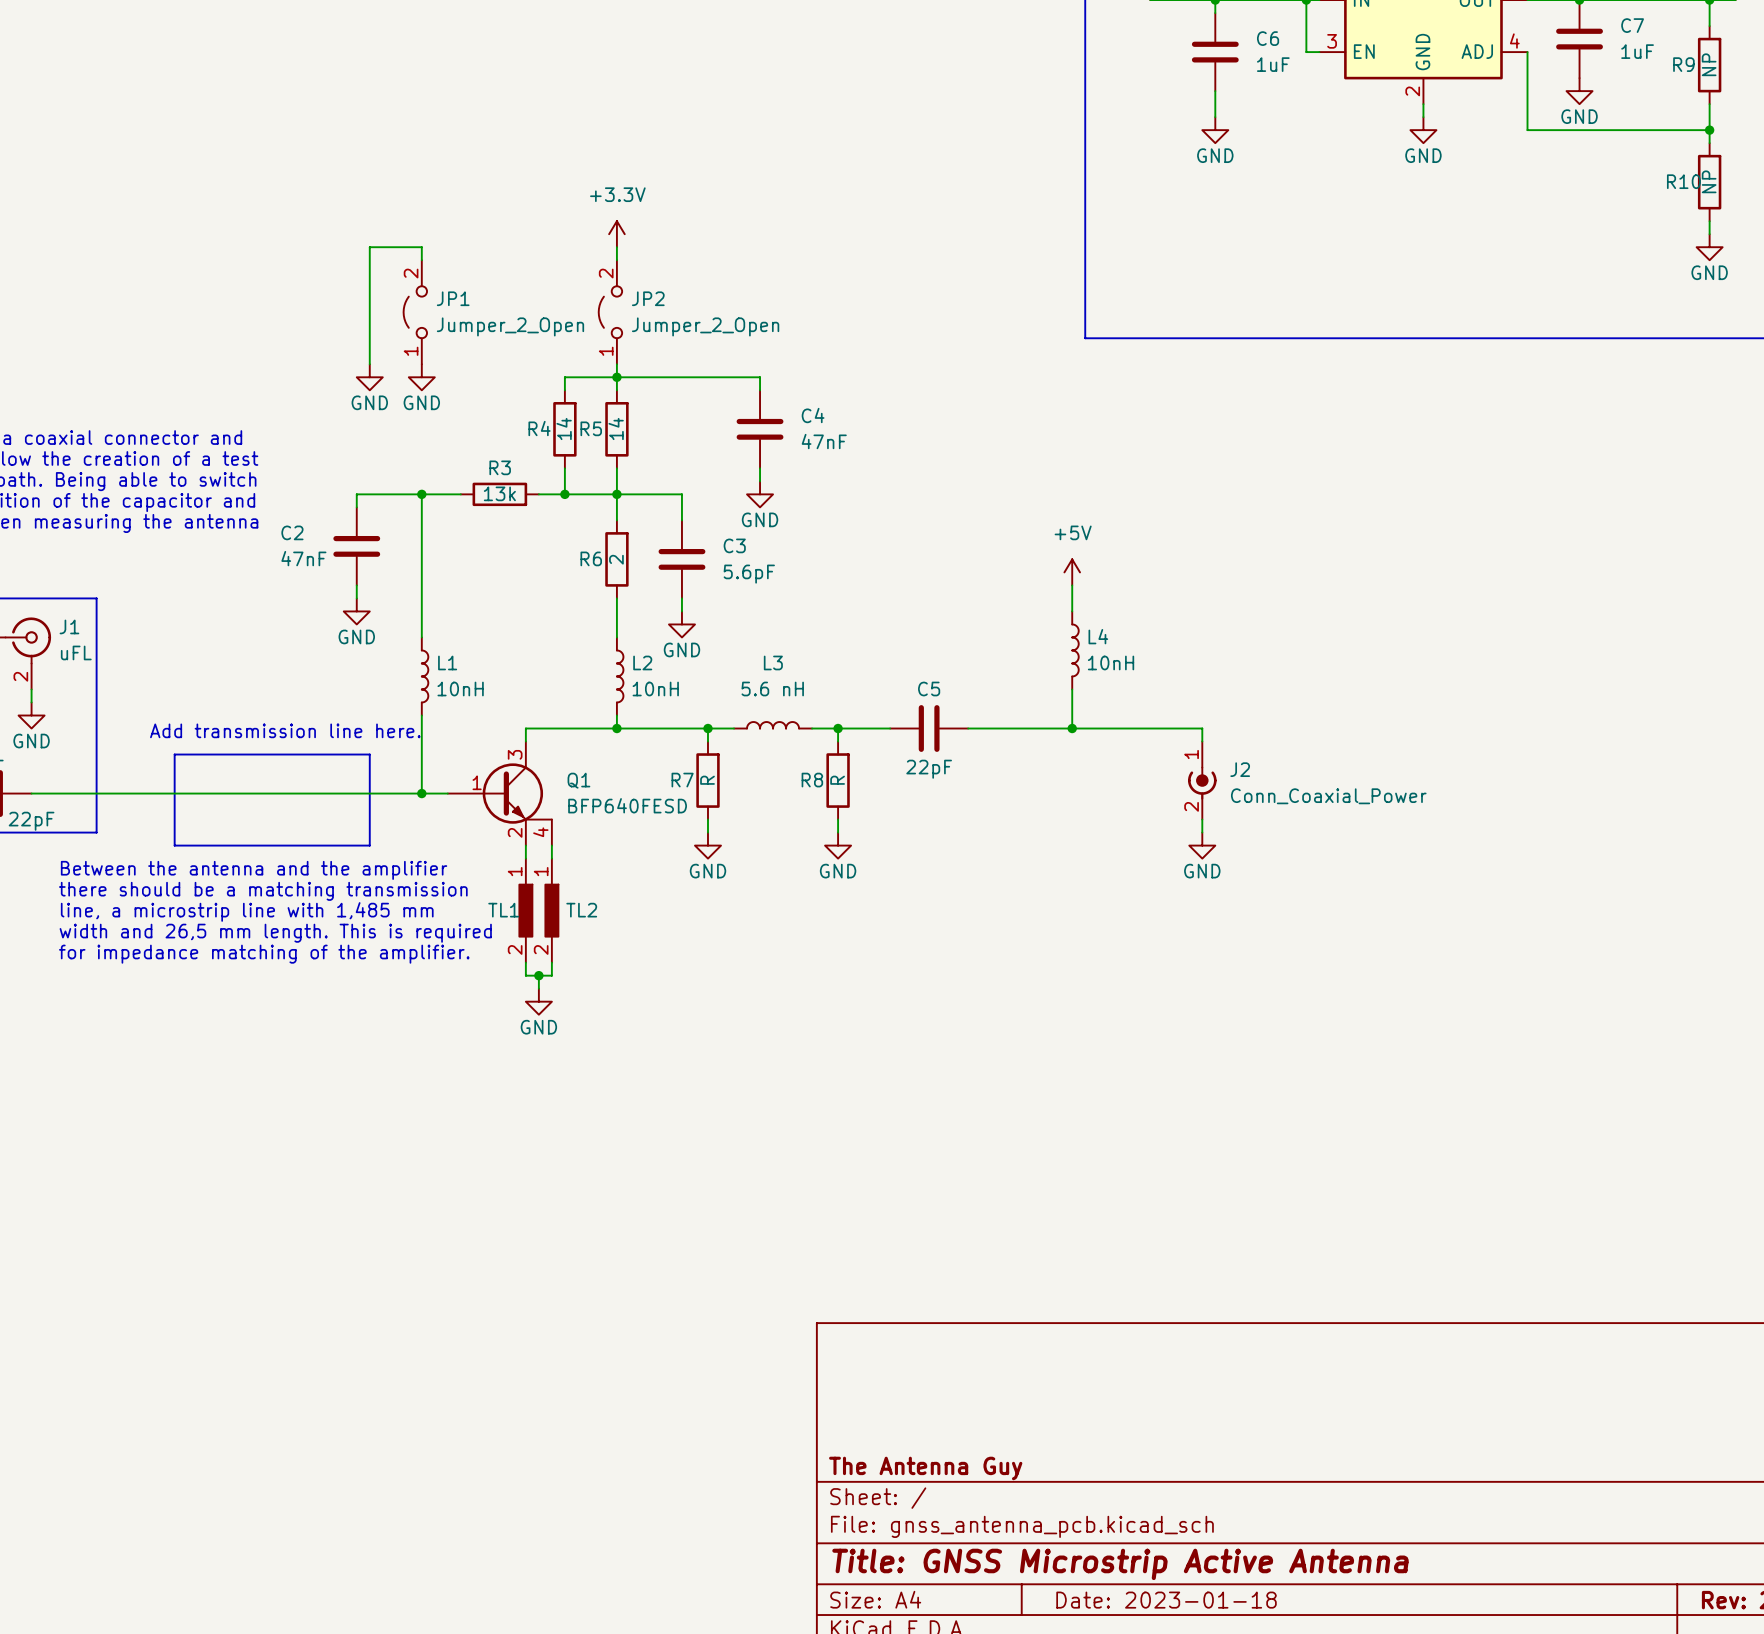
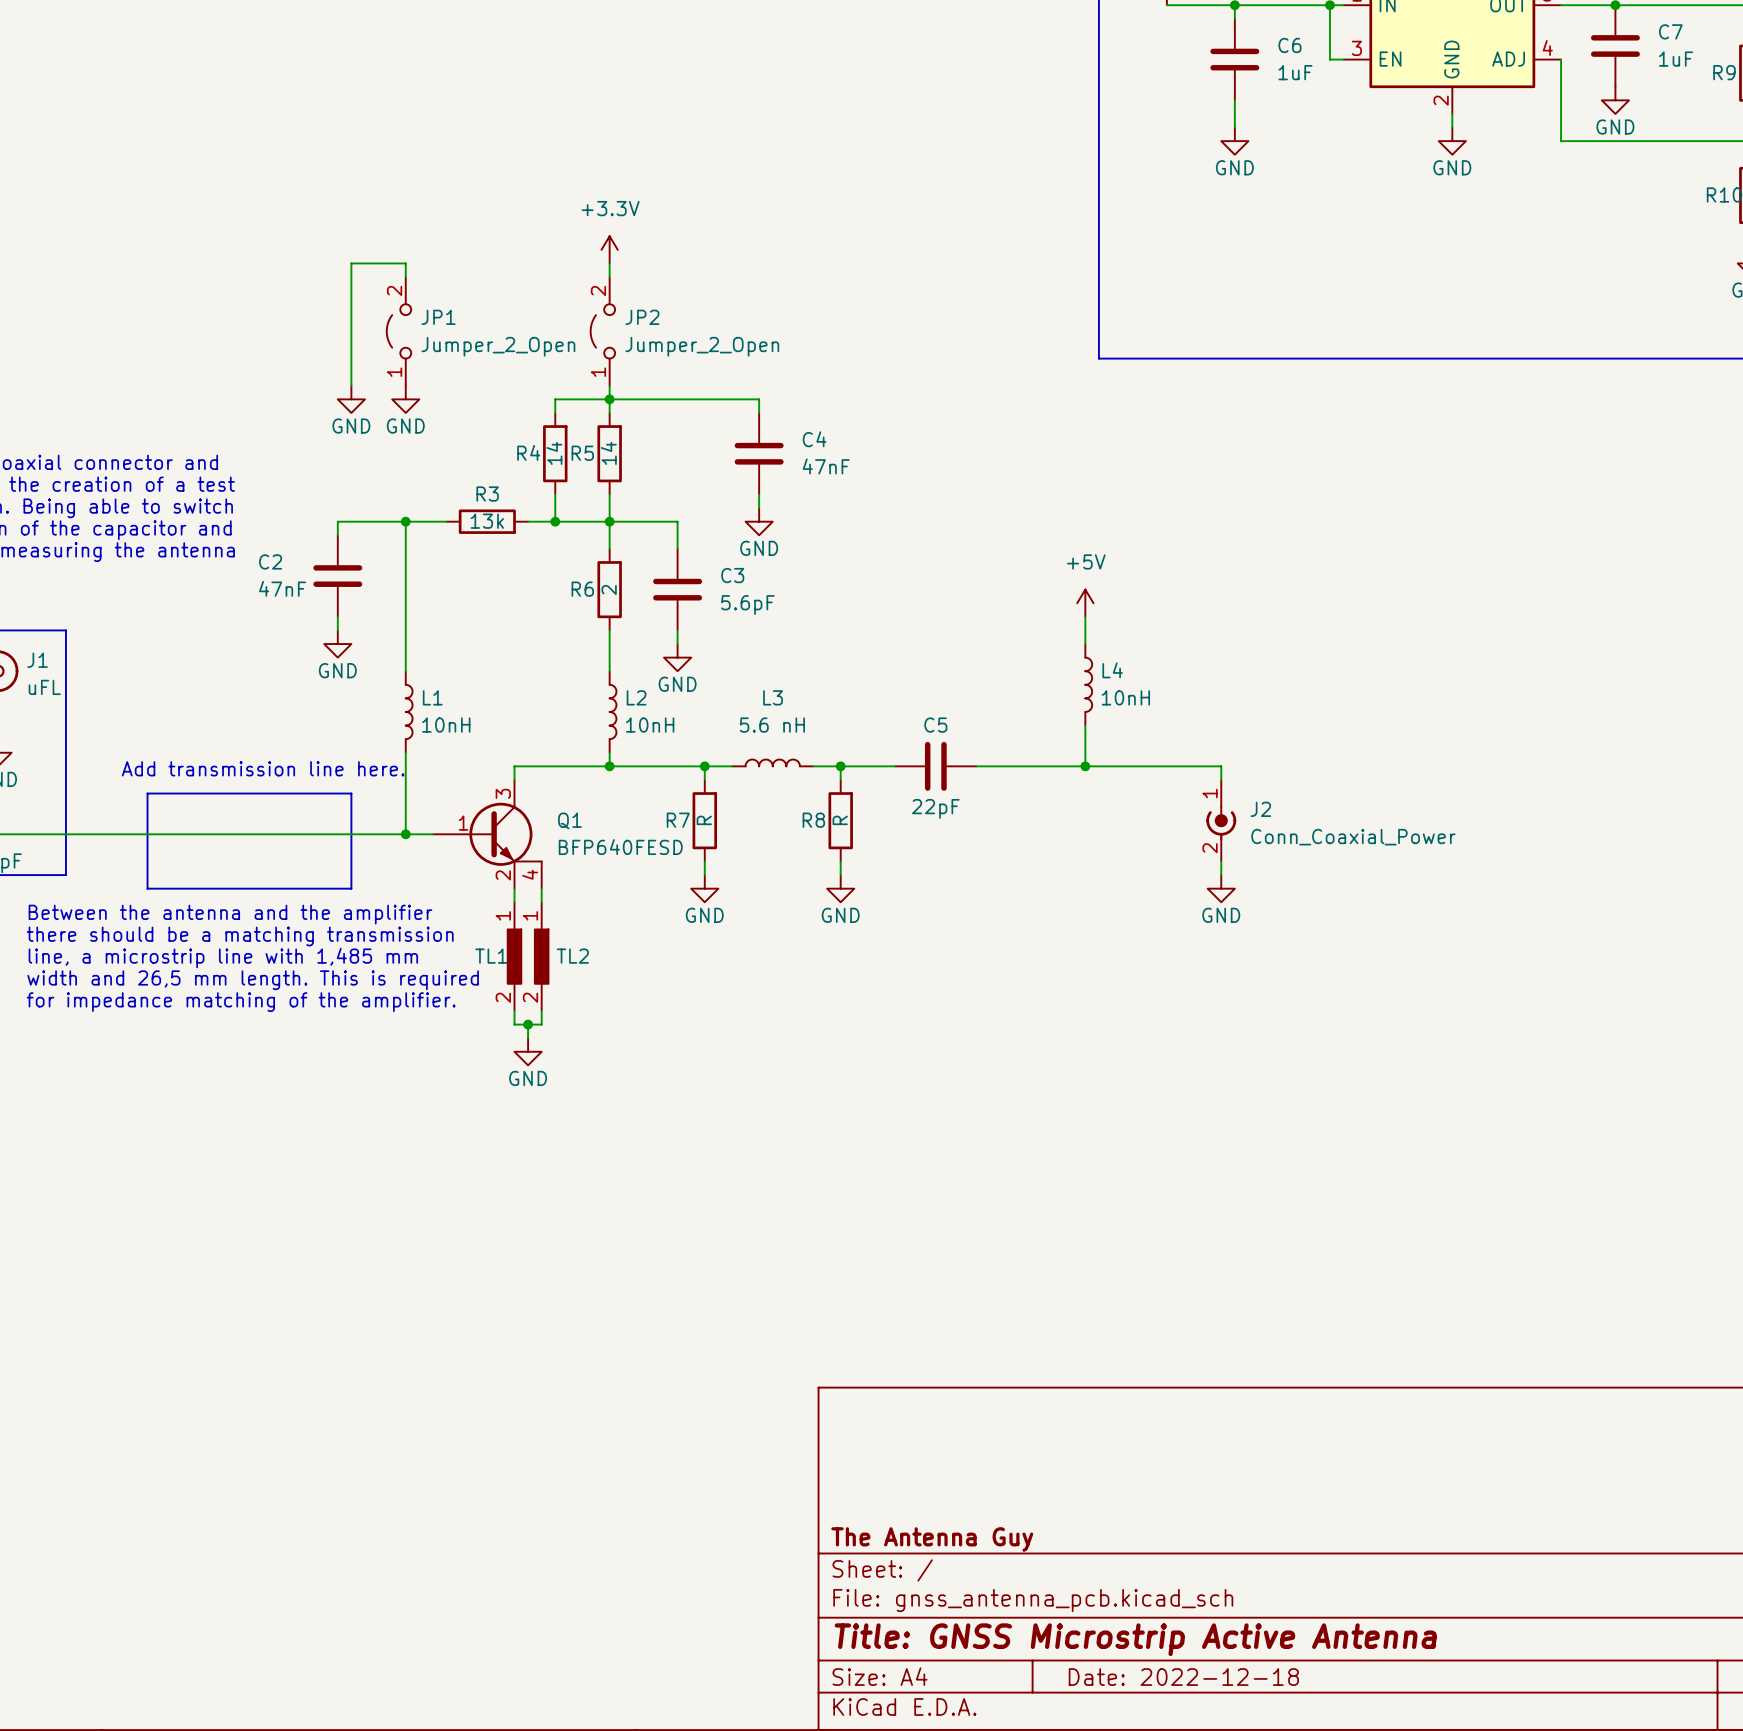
title block: Date: 2023-01-18 (1166, 1600) -> Date: 2022-12-18 (1183, 1677)

